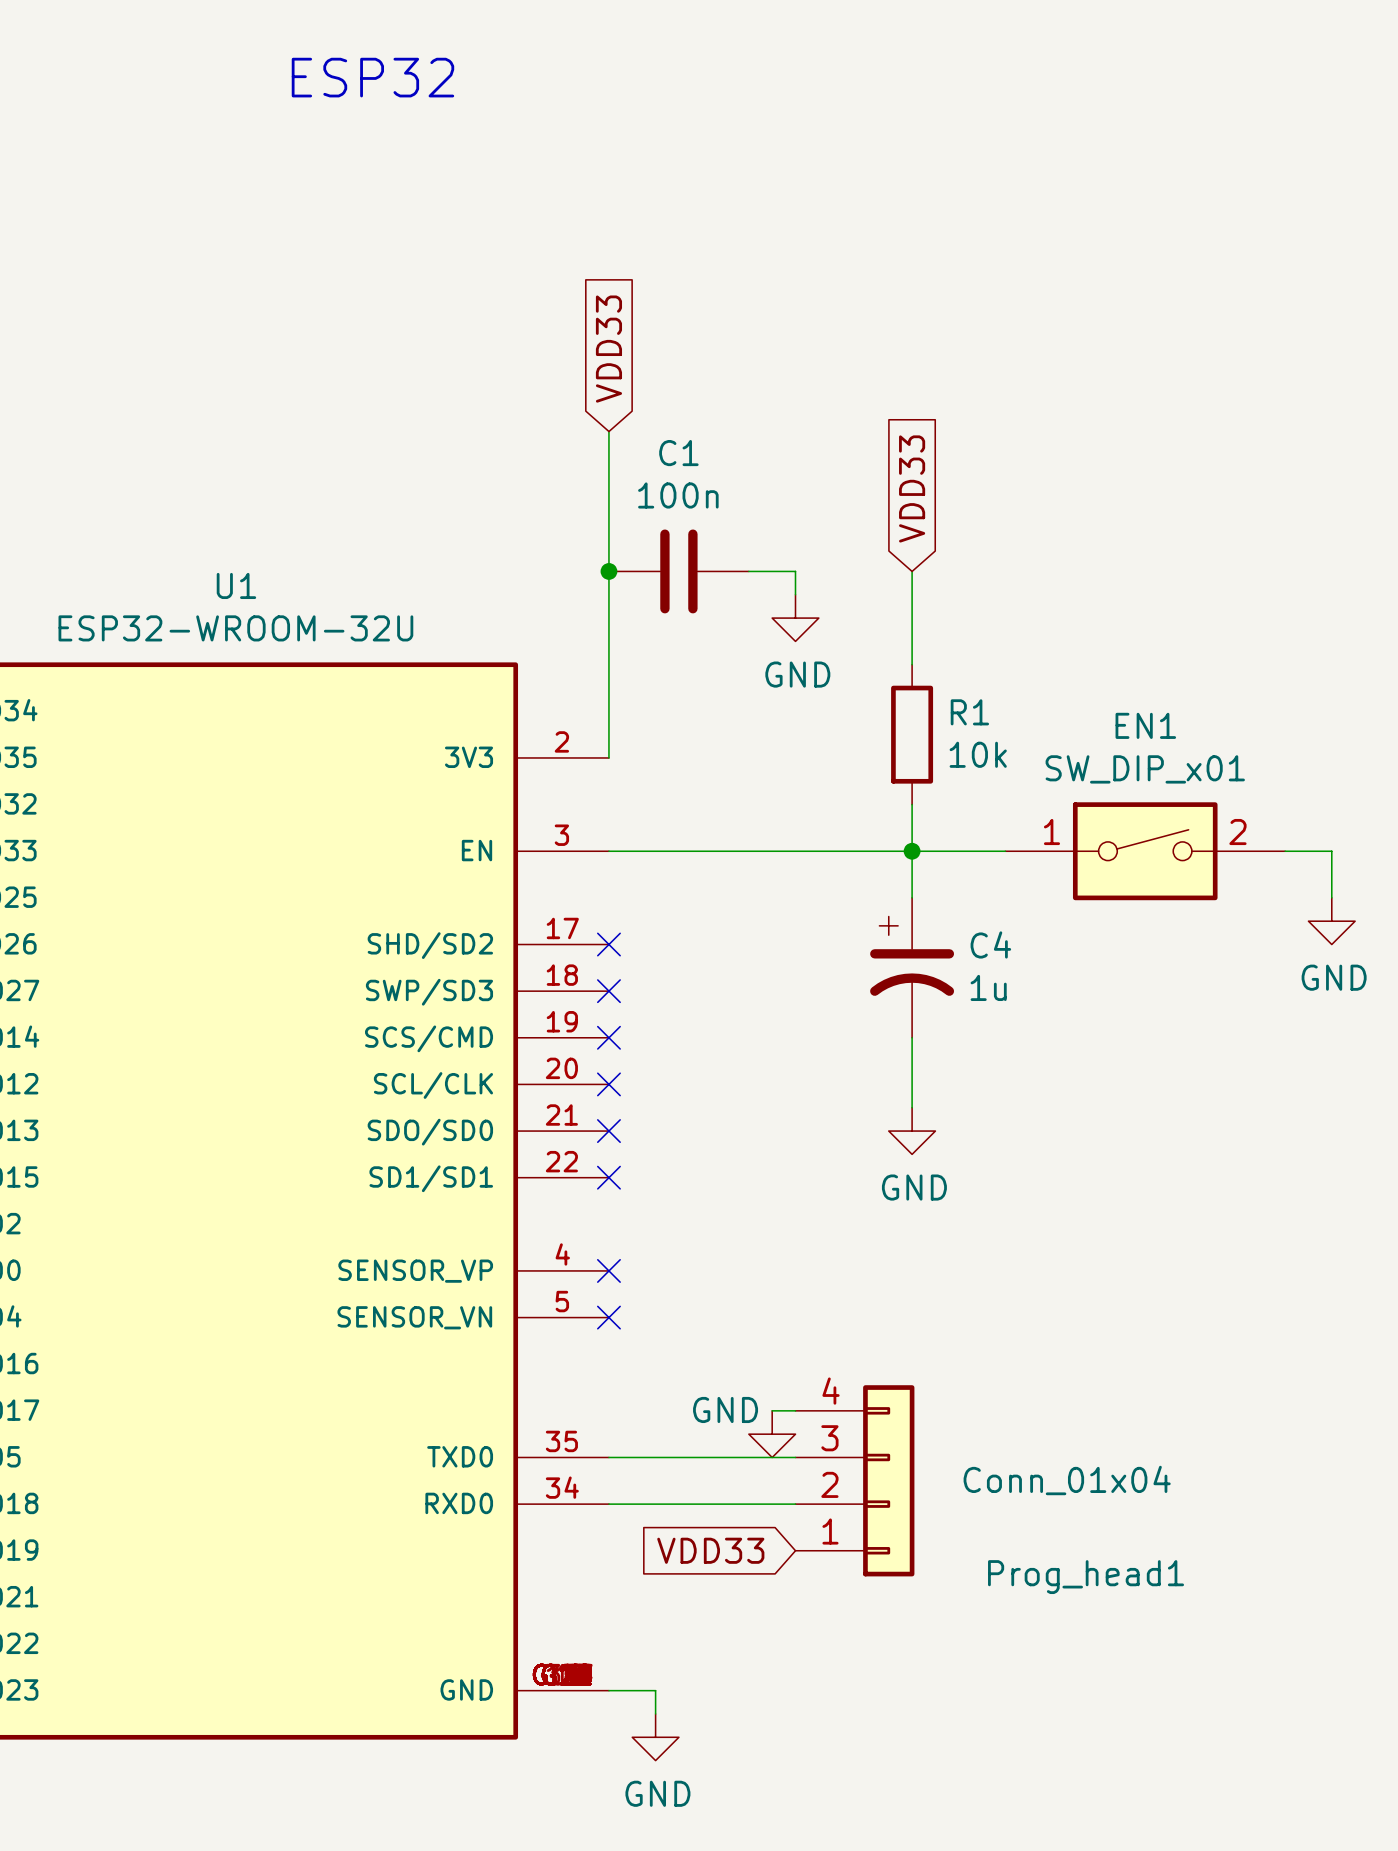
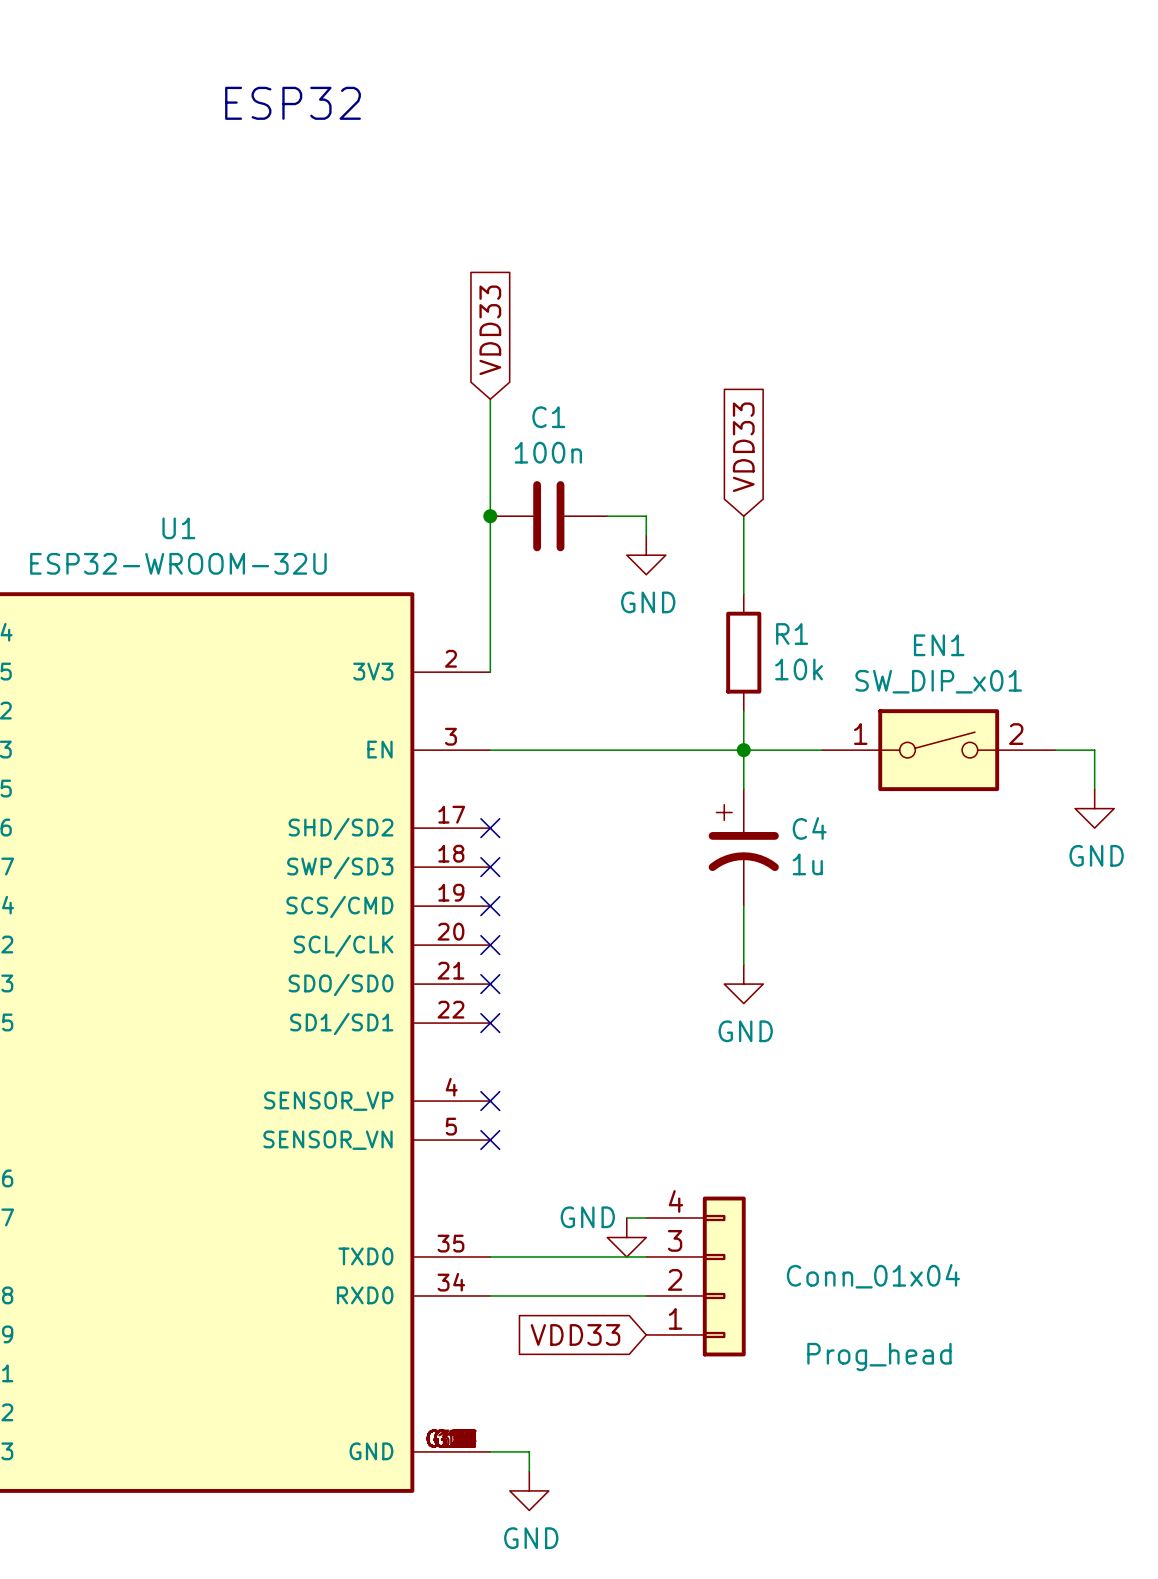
Prog_head1 name: Prog_head1 (1086, 1577) -> Prog_head (879, 1356)

